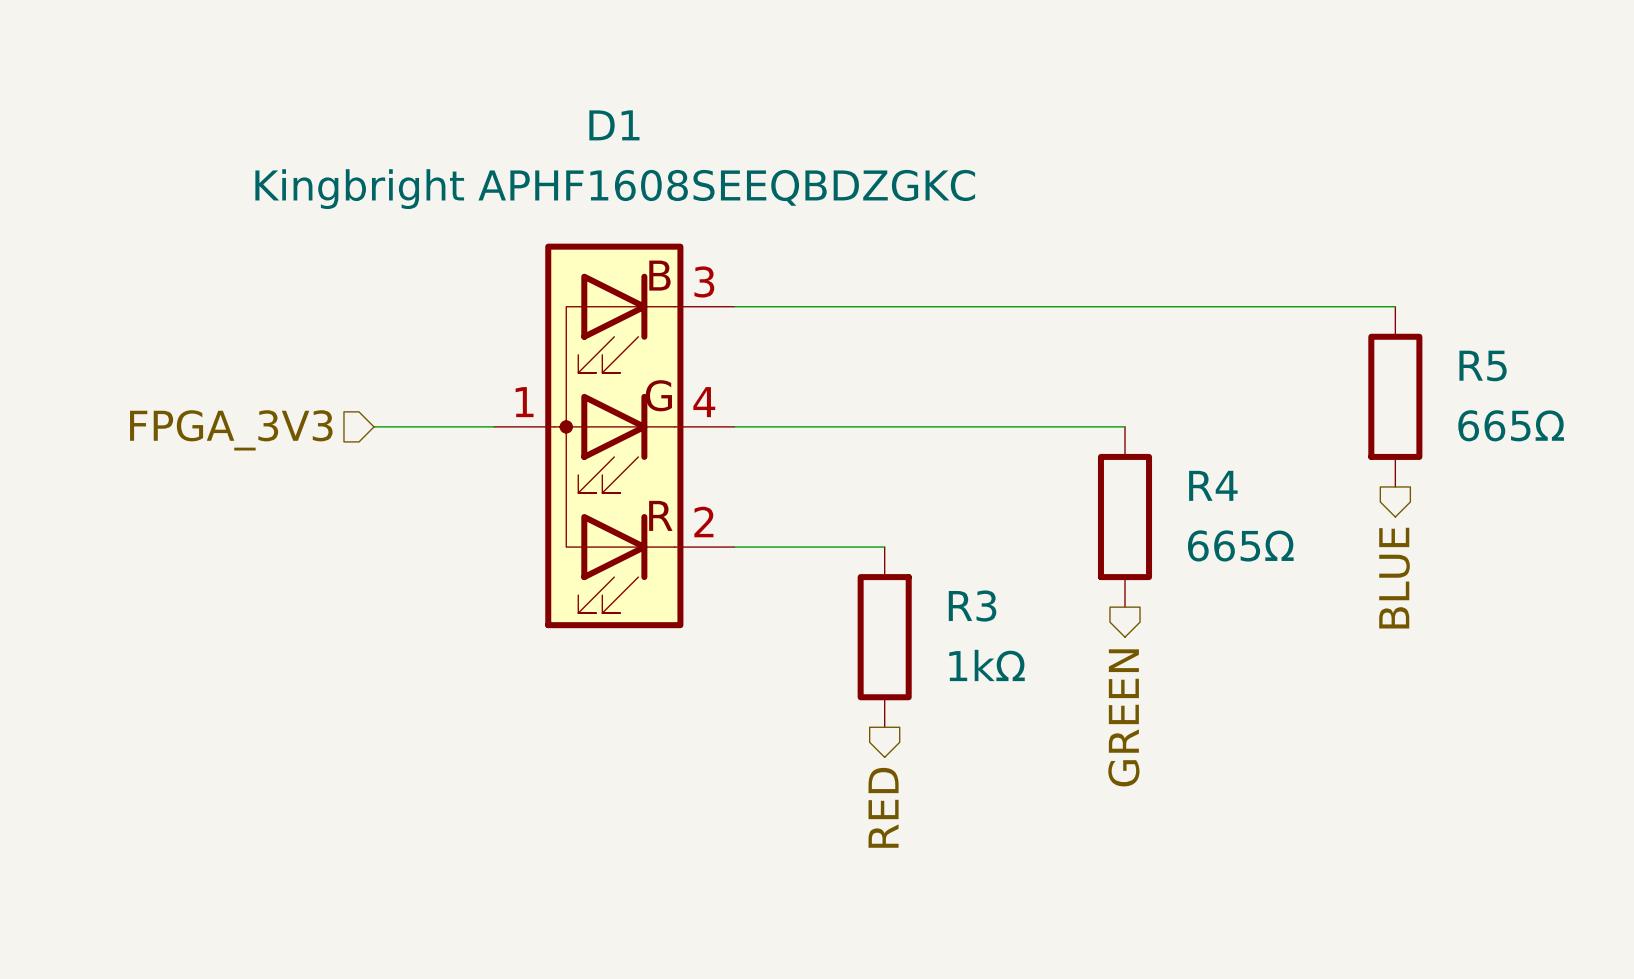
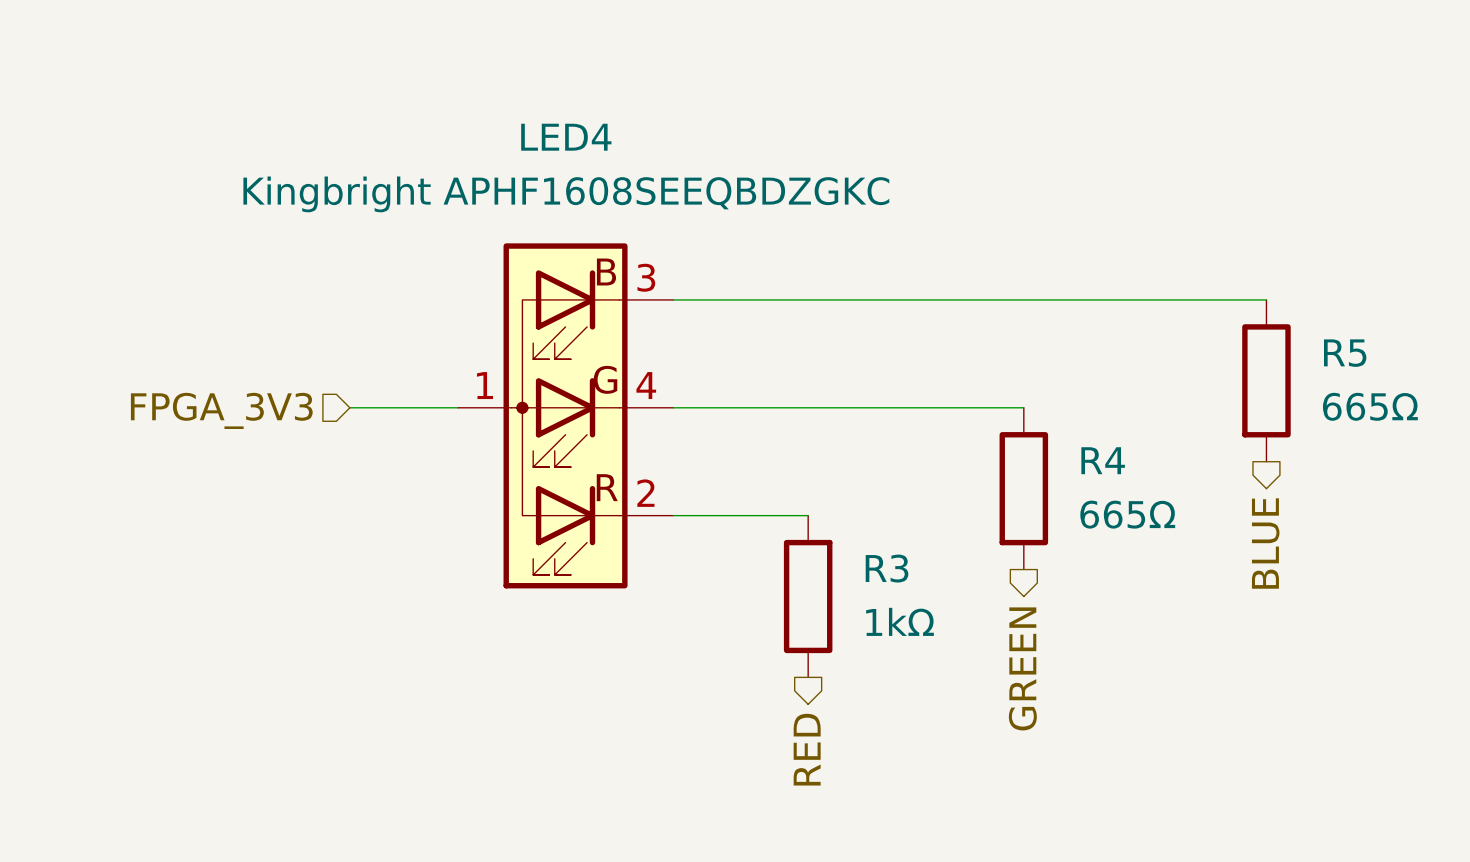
D1 name: D1 (614, 125) -> LED4 (566, 137)

